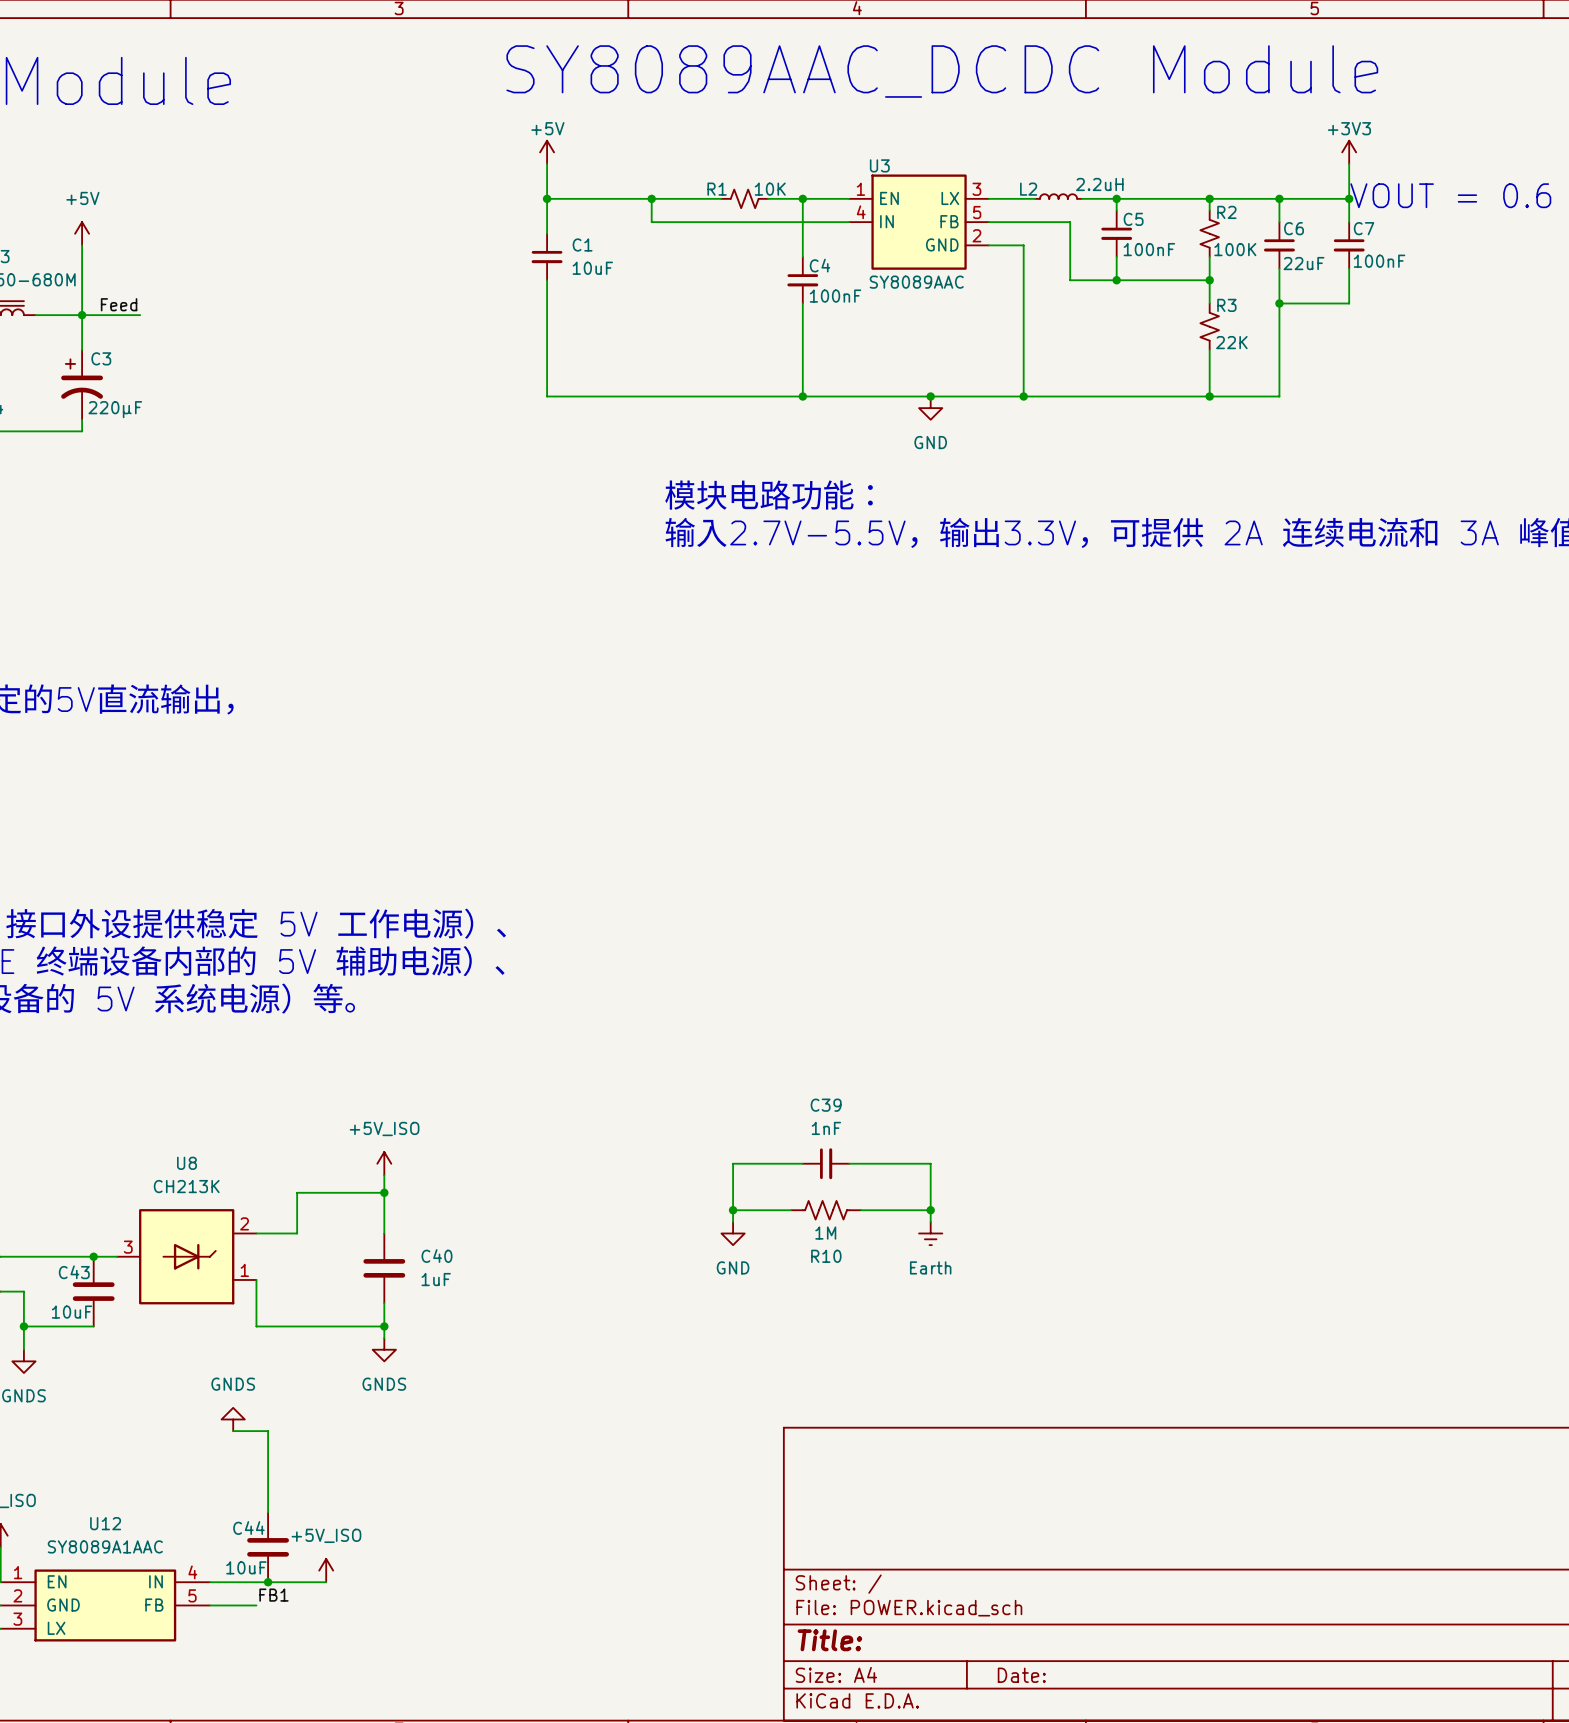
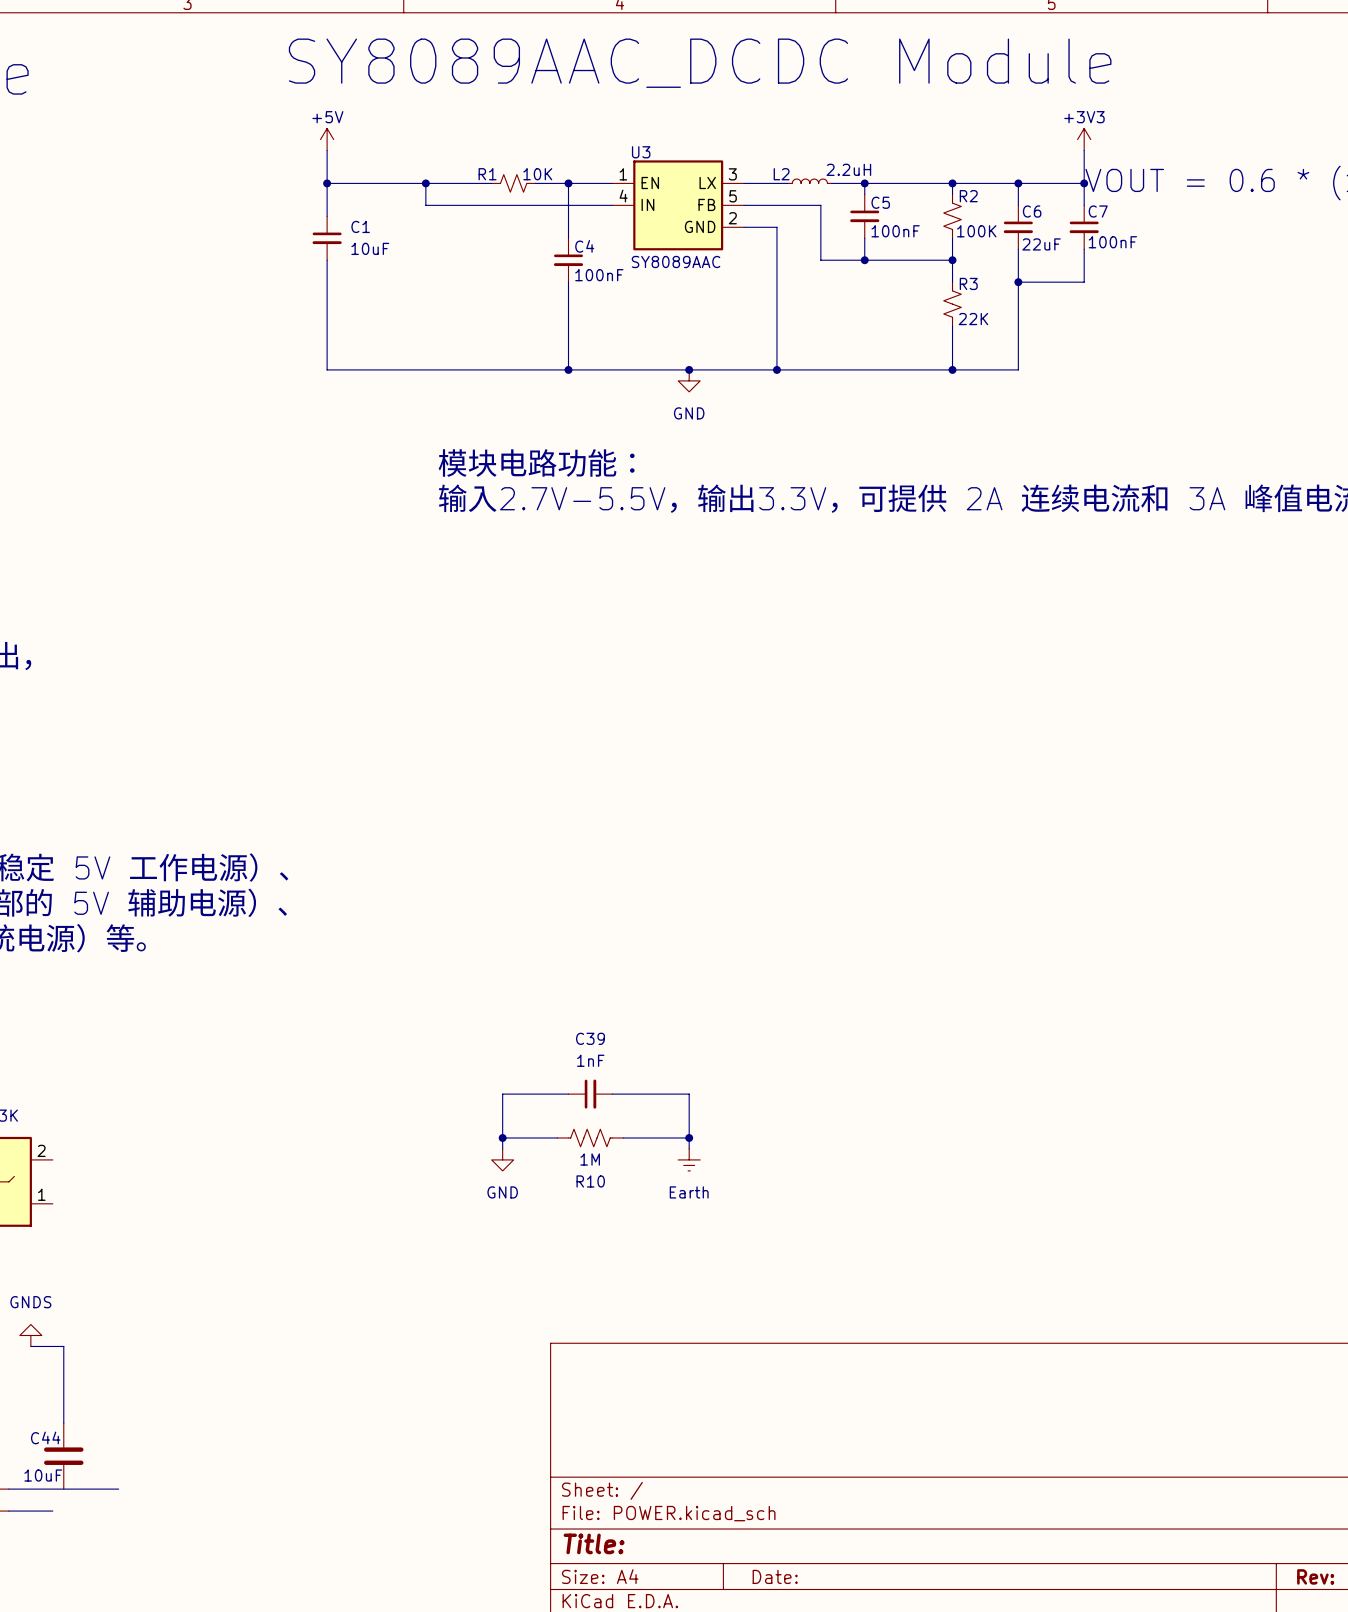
power symbol: +5V_ISO (384, 1163) -> none
wire: (384, 1175) (384, 1233) -> none
wire: (384, 1192) (297, 1192) (297, 1233) (256, 1233) -> none
junction: (384, 1192) -> none
C40: 1uF (384, 1268) -> none
wire: (256, 1279) (256, 1326) (384, 1326) -> none
wire: (384, 1303) (384, 1338) -> none
junction: (384, 1326) -> none
power symbol: GNDS (384, 1349) -> none
power symbol: +5V_ISO (326, 1570) -> none
junction: (268, 1582) -> none
label: FB1 (273, 1595) -> none

